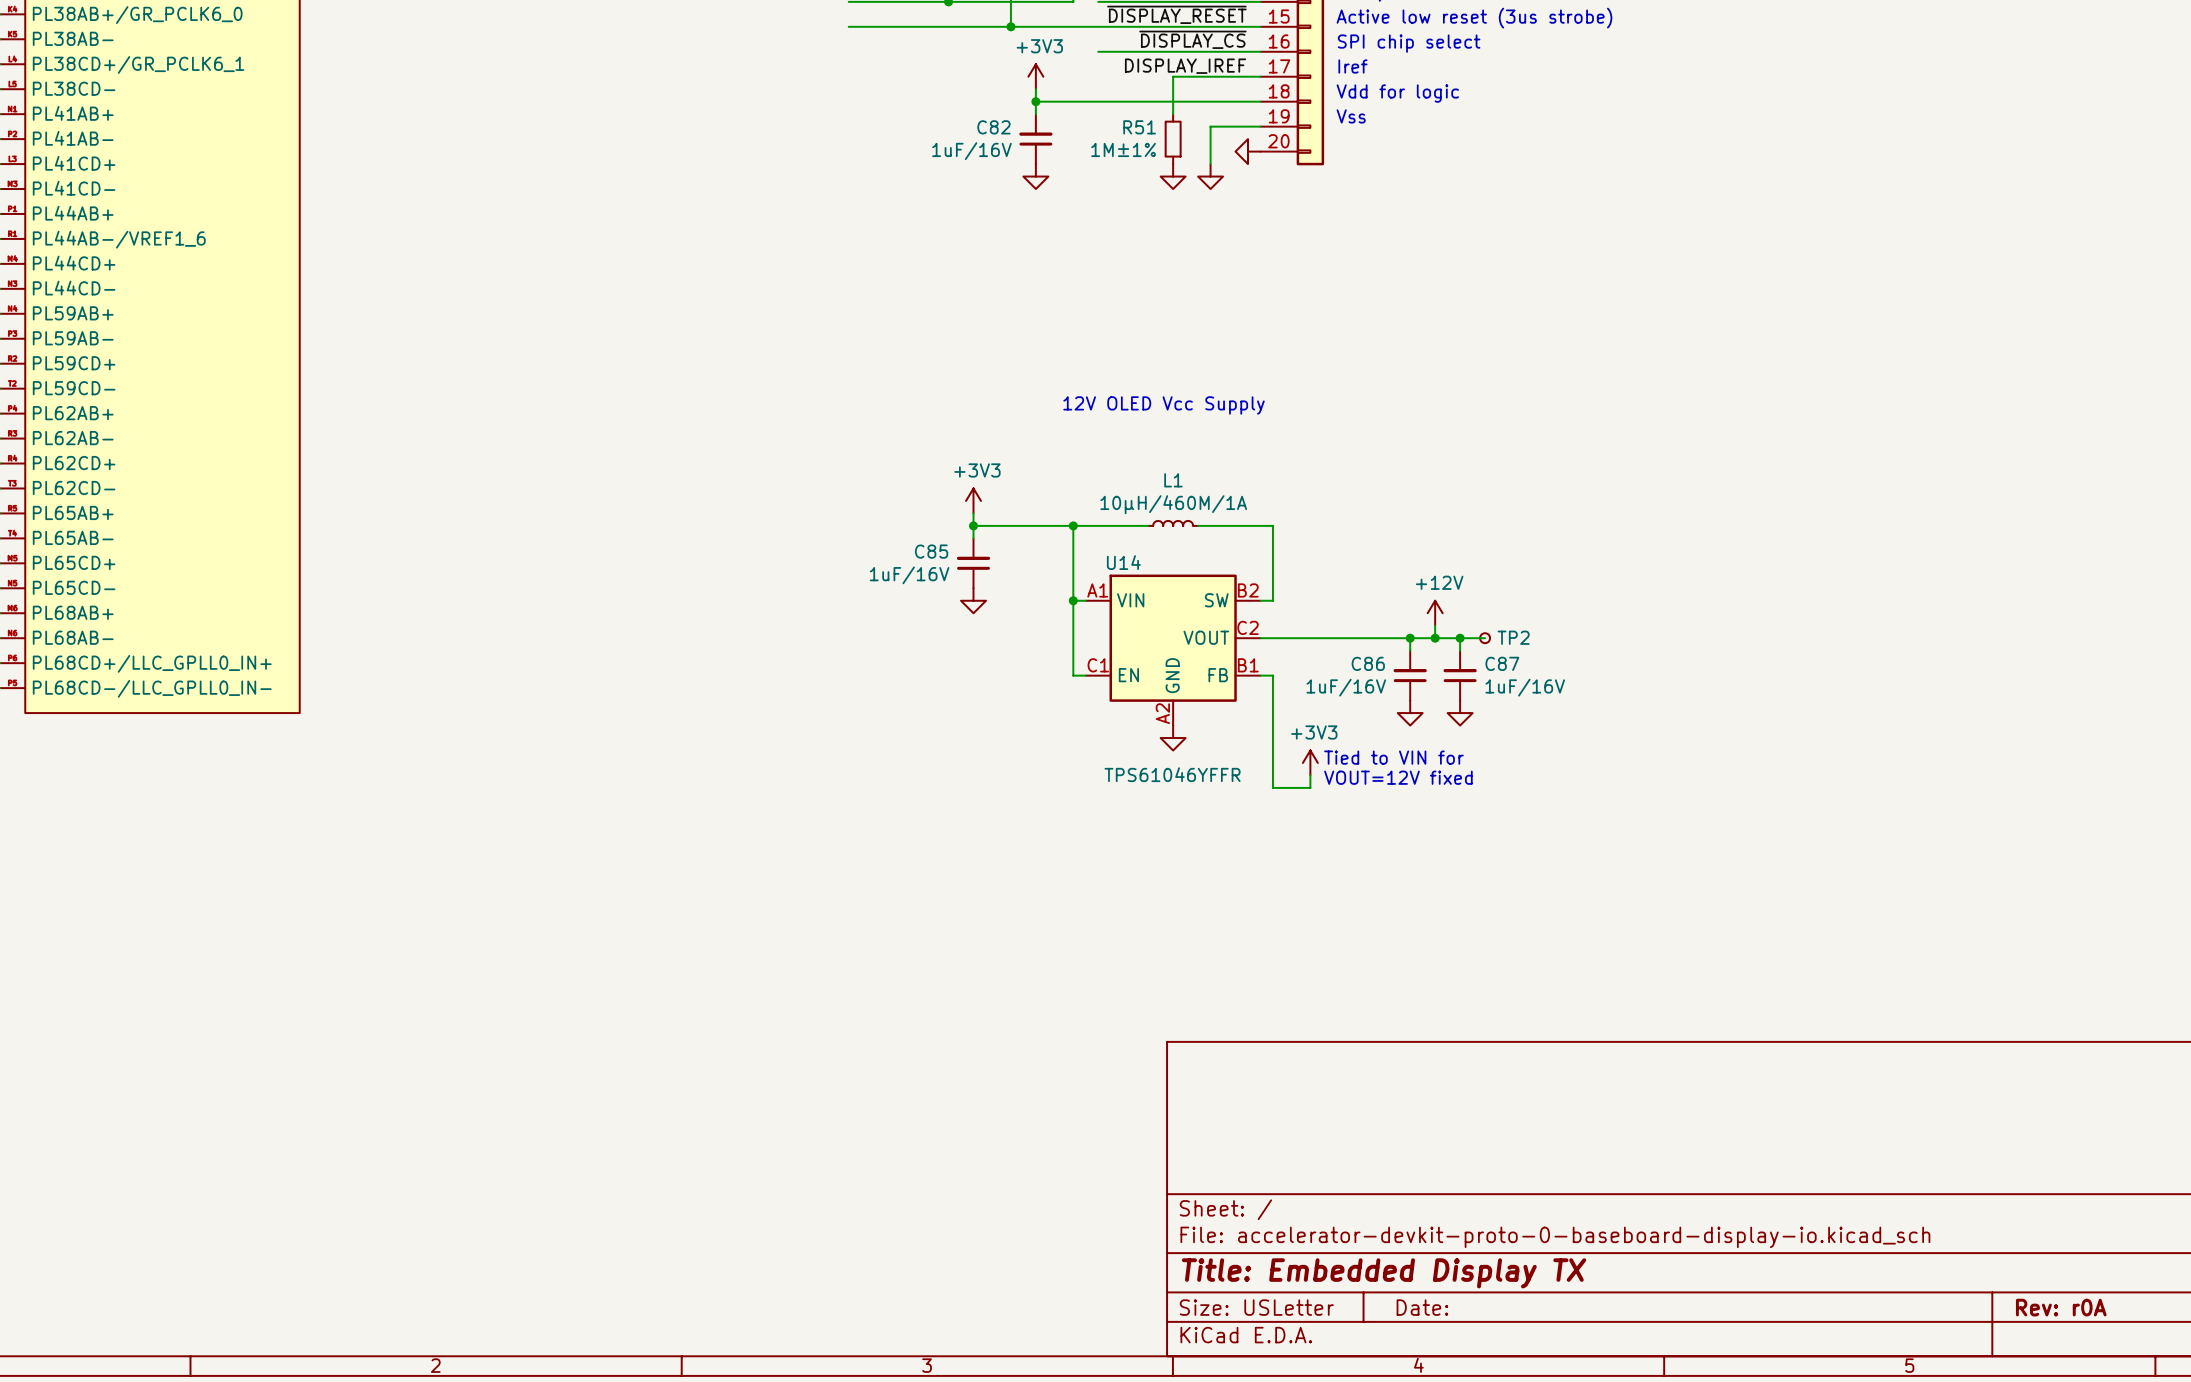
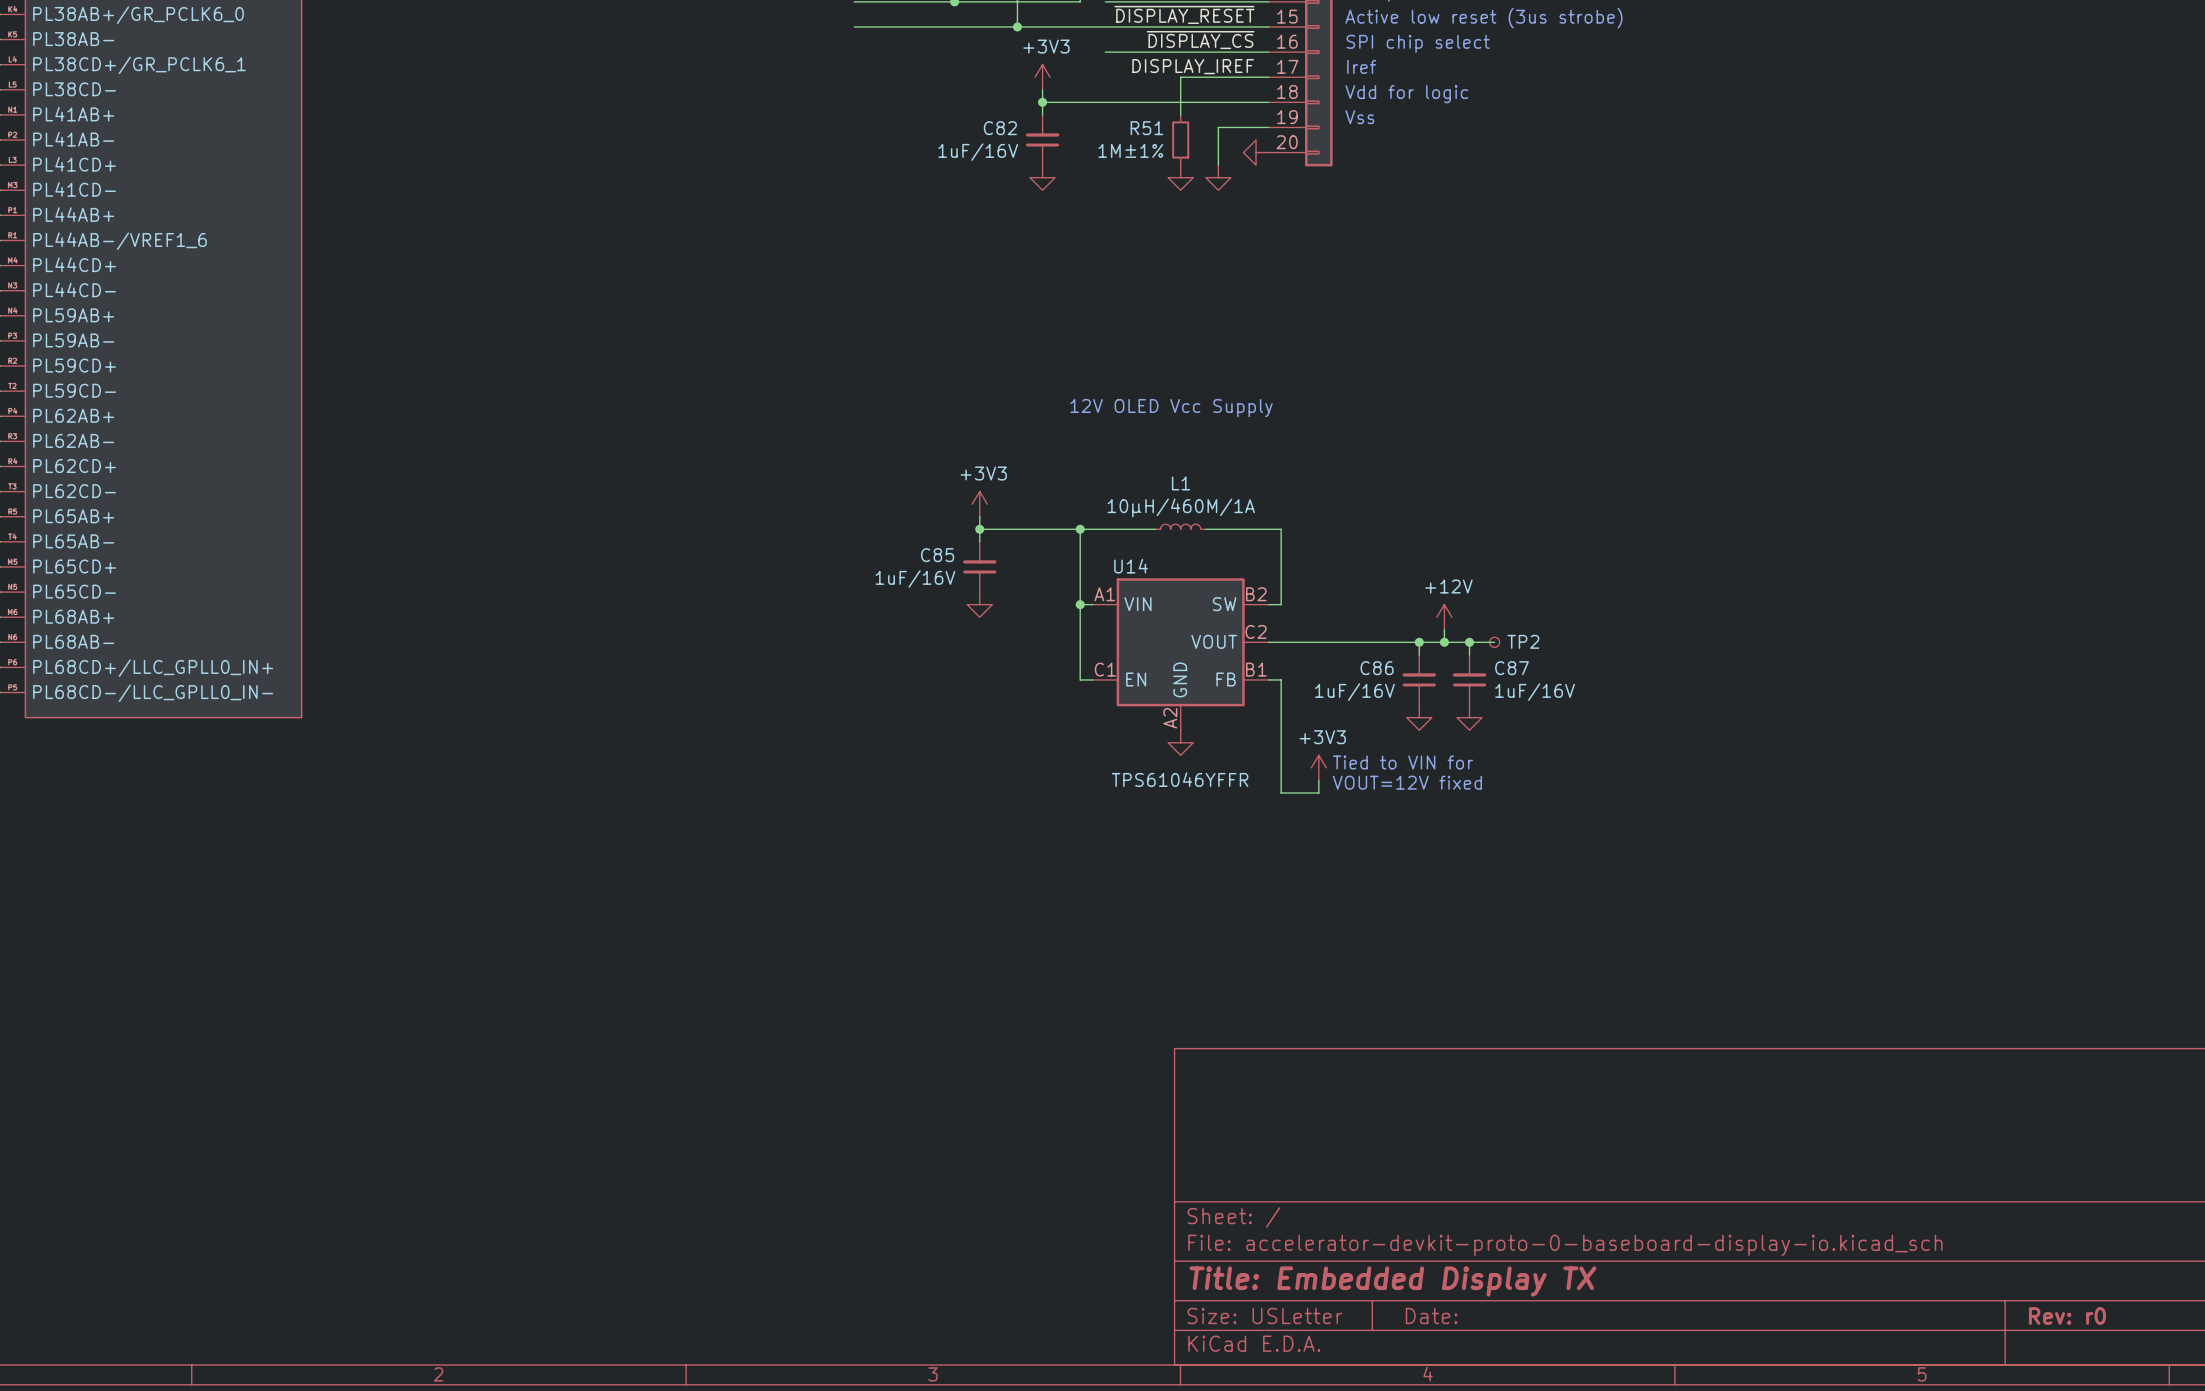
title block: Rev: r0A (2061, 1307) -> Rev: r0 (2067, 1315)

